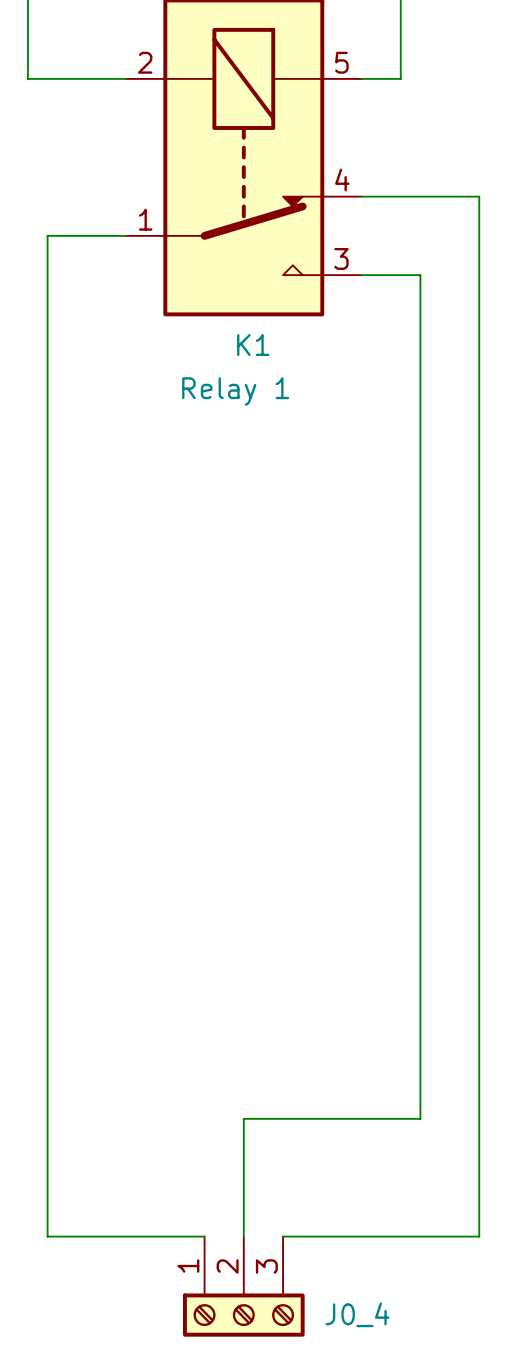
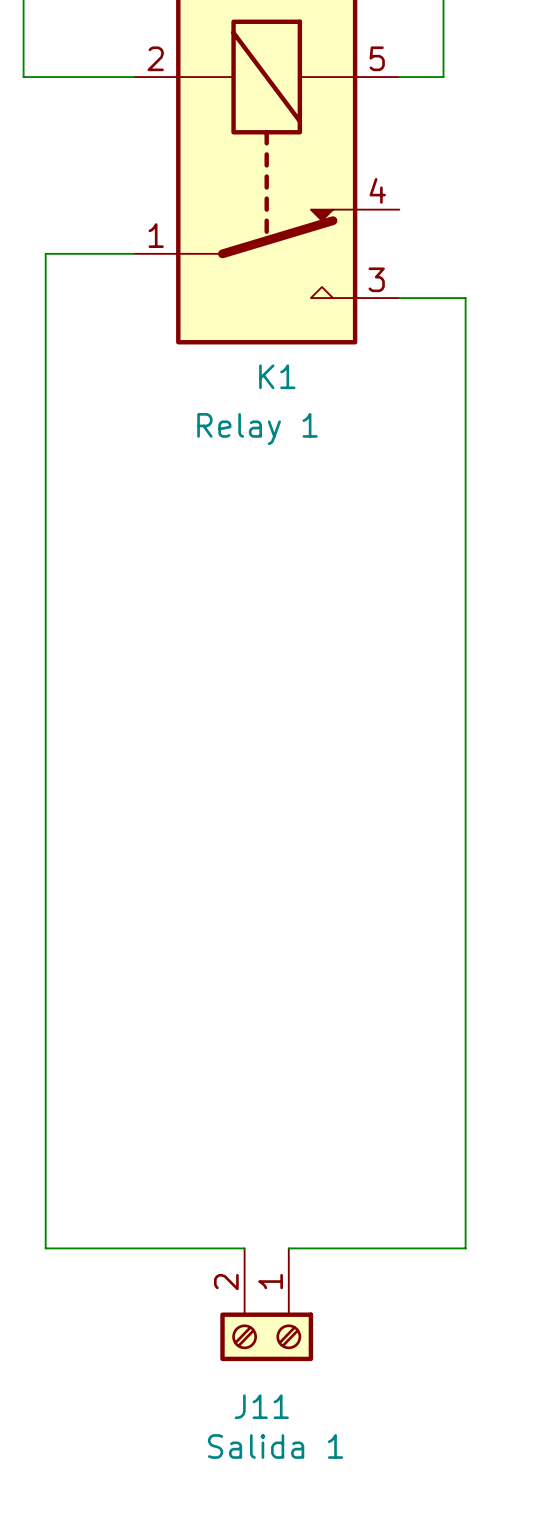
wire: (361, 196) (479, 196) (479, 1236) (283, 1236) -> none
wire: (47, 1118) (47, 1236) (204, 1236) -> (45, 1248) (244, 1248)
wire: (263, 1118) (243, 1118) (243, 1236) -> none
J11: none -> Salida 1 (266, 1304)
J0_4: (243, 1286) -> none

